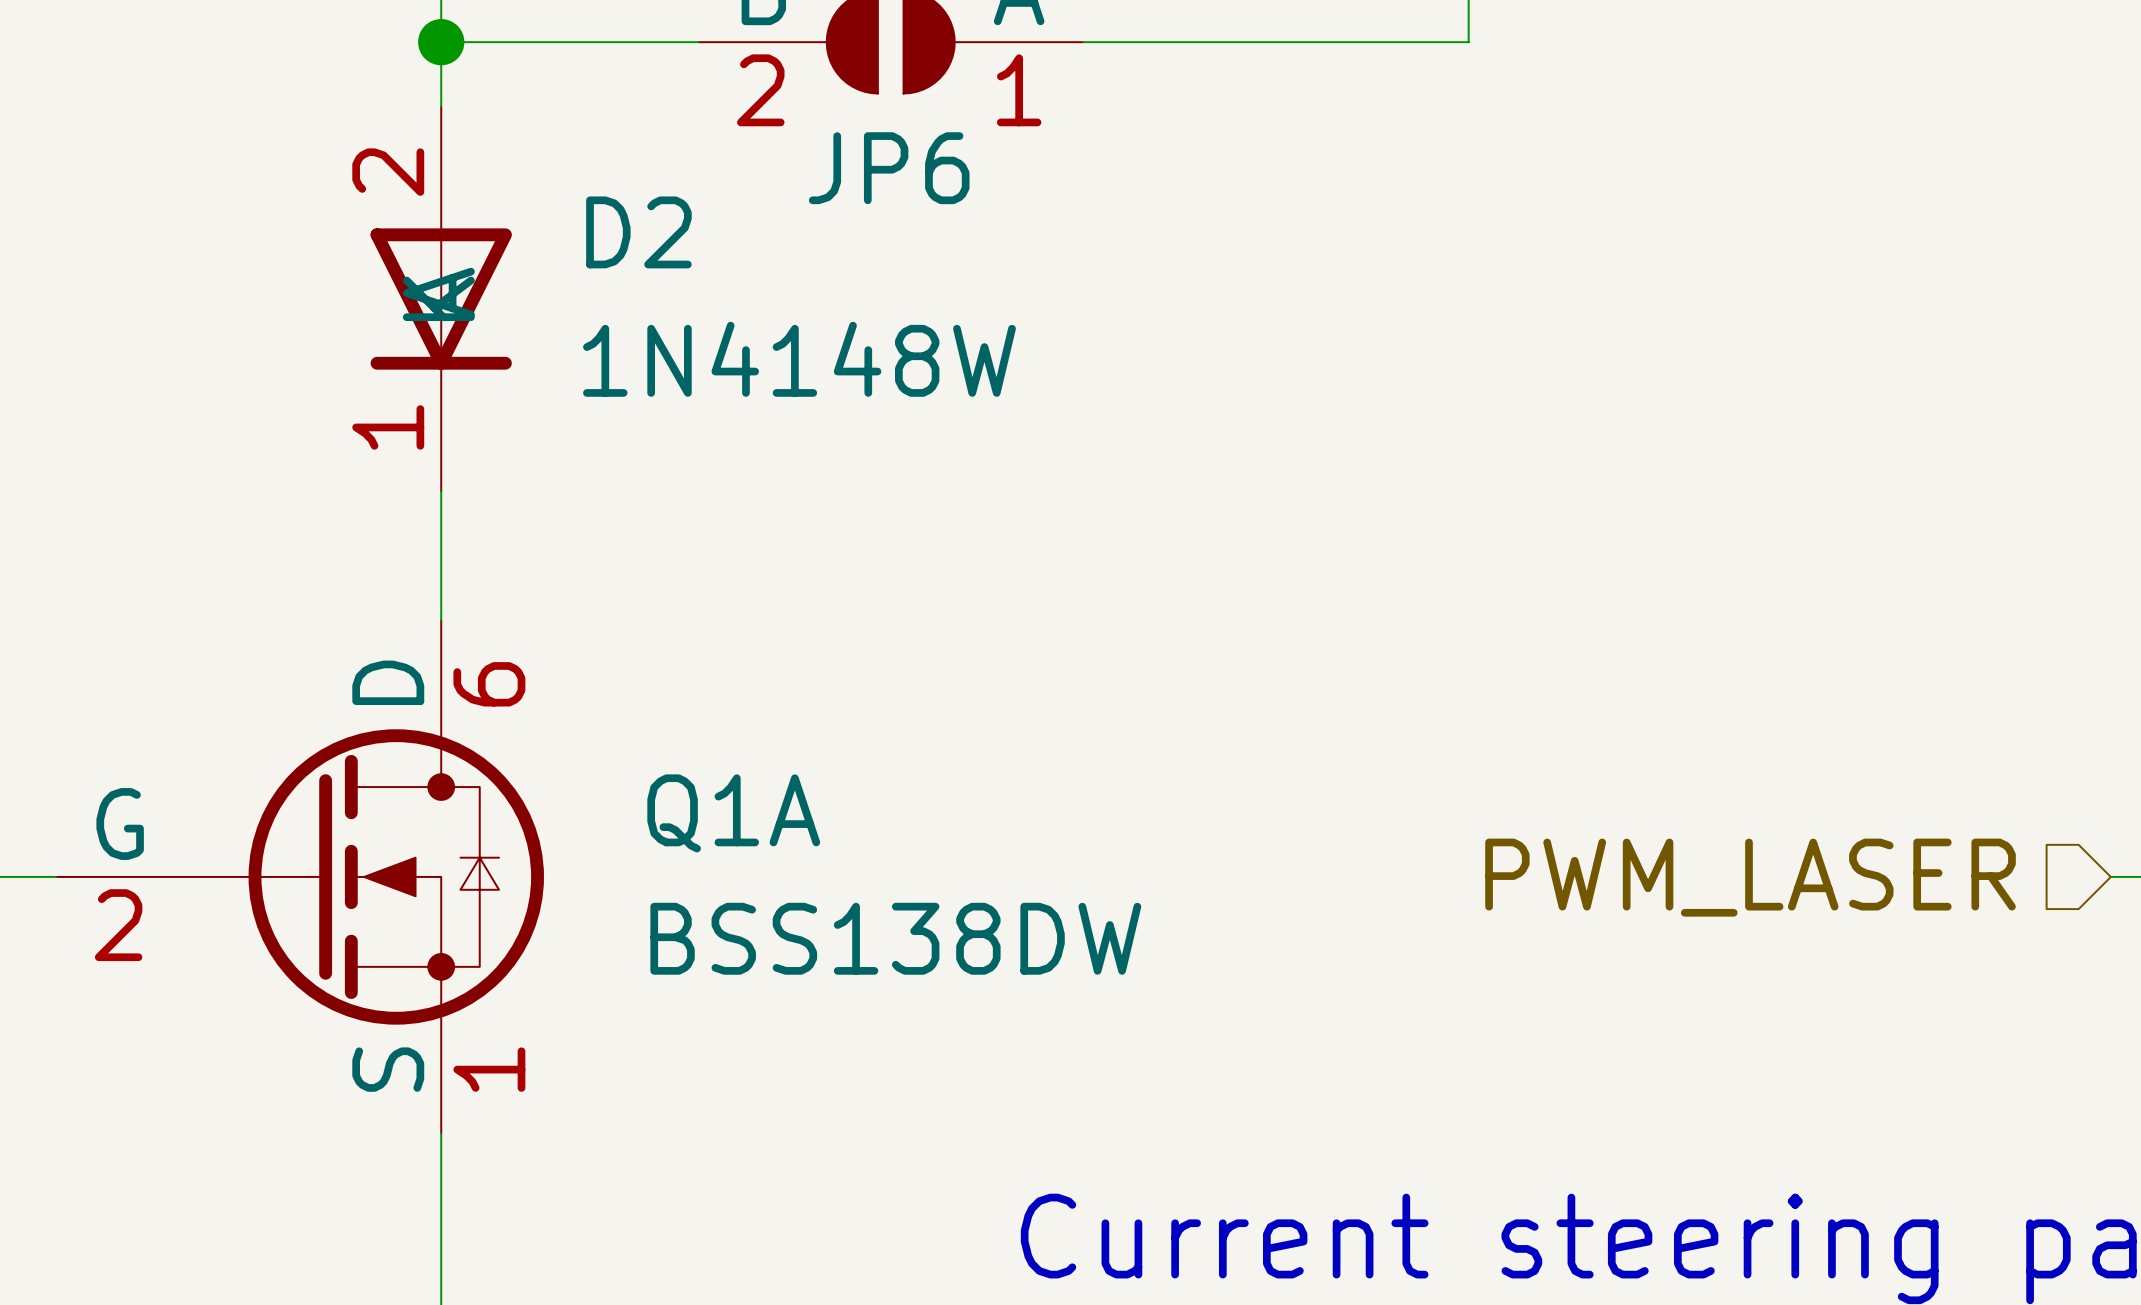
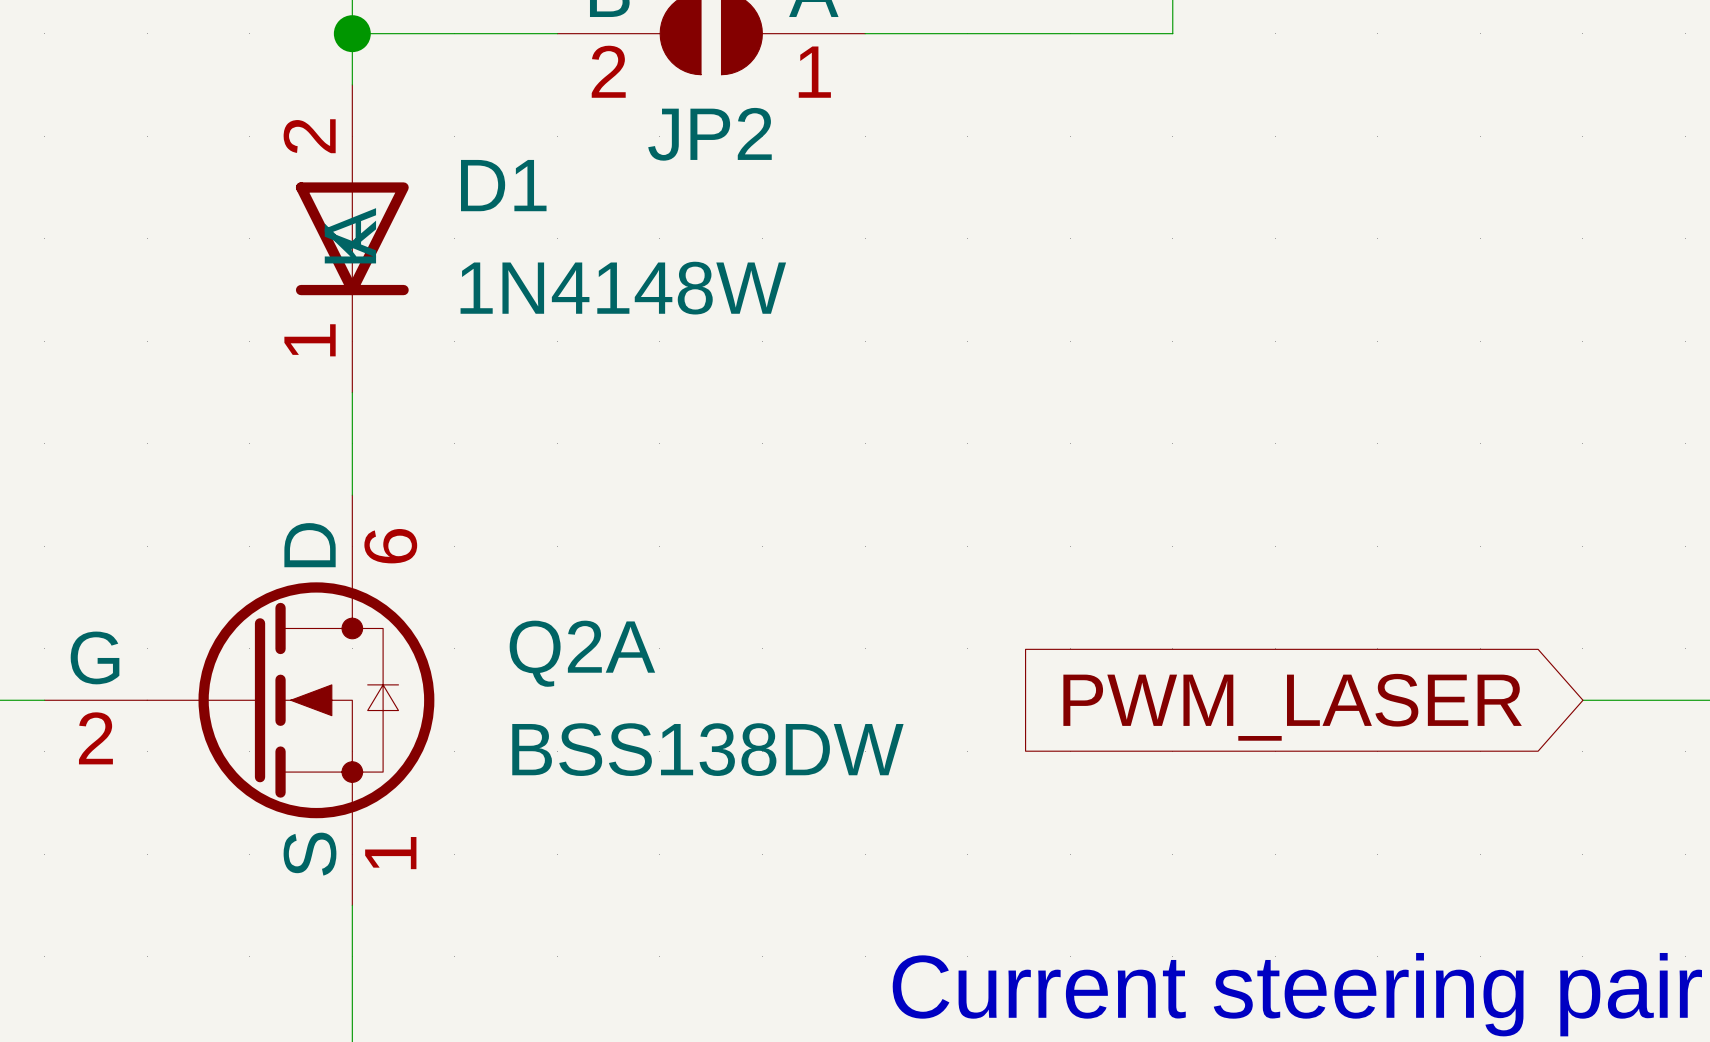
JP6 name: JP6 (889, 168) -> JP2 (709, 134)
D2 name: D2 (638, 232) -> D1 (503, 185)
Q1A name: Q1A (733, 813) -> Q2A (582, 653)
wire: none -> (1582, 700) (1685, 700)
hierarchical label: PWM_LASER (1750, 877) -> none
global label: none -> PWM_LASER (1292, 707)

